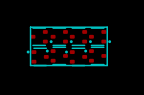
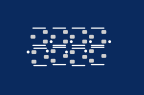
line: (30, 27) (107, 27) (107, 65) (30, 65) (30, 27) -> none

